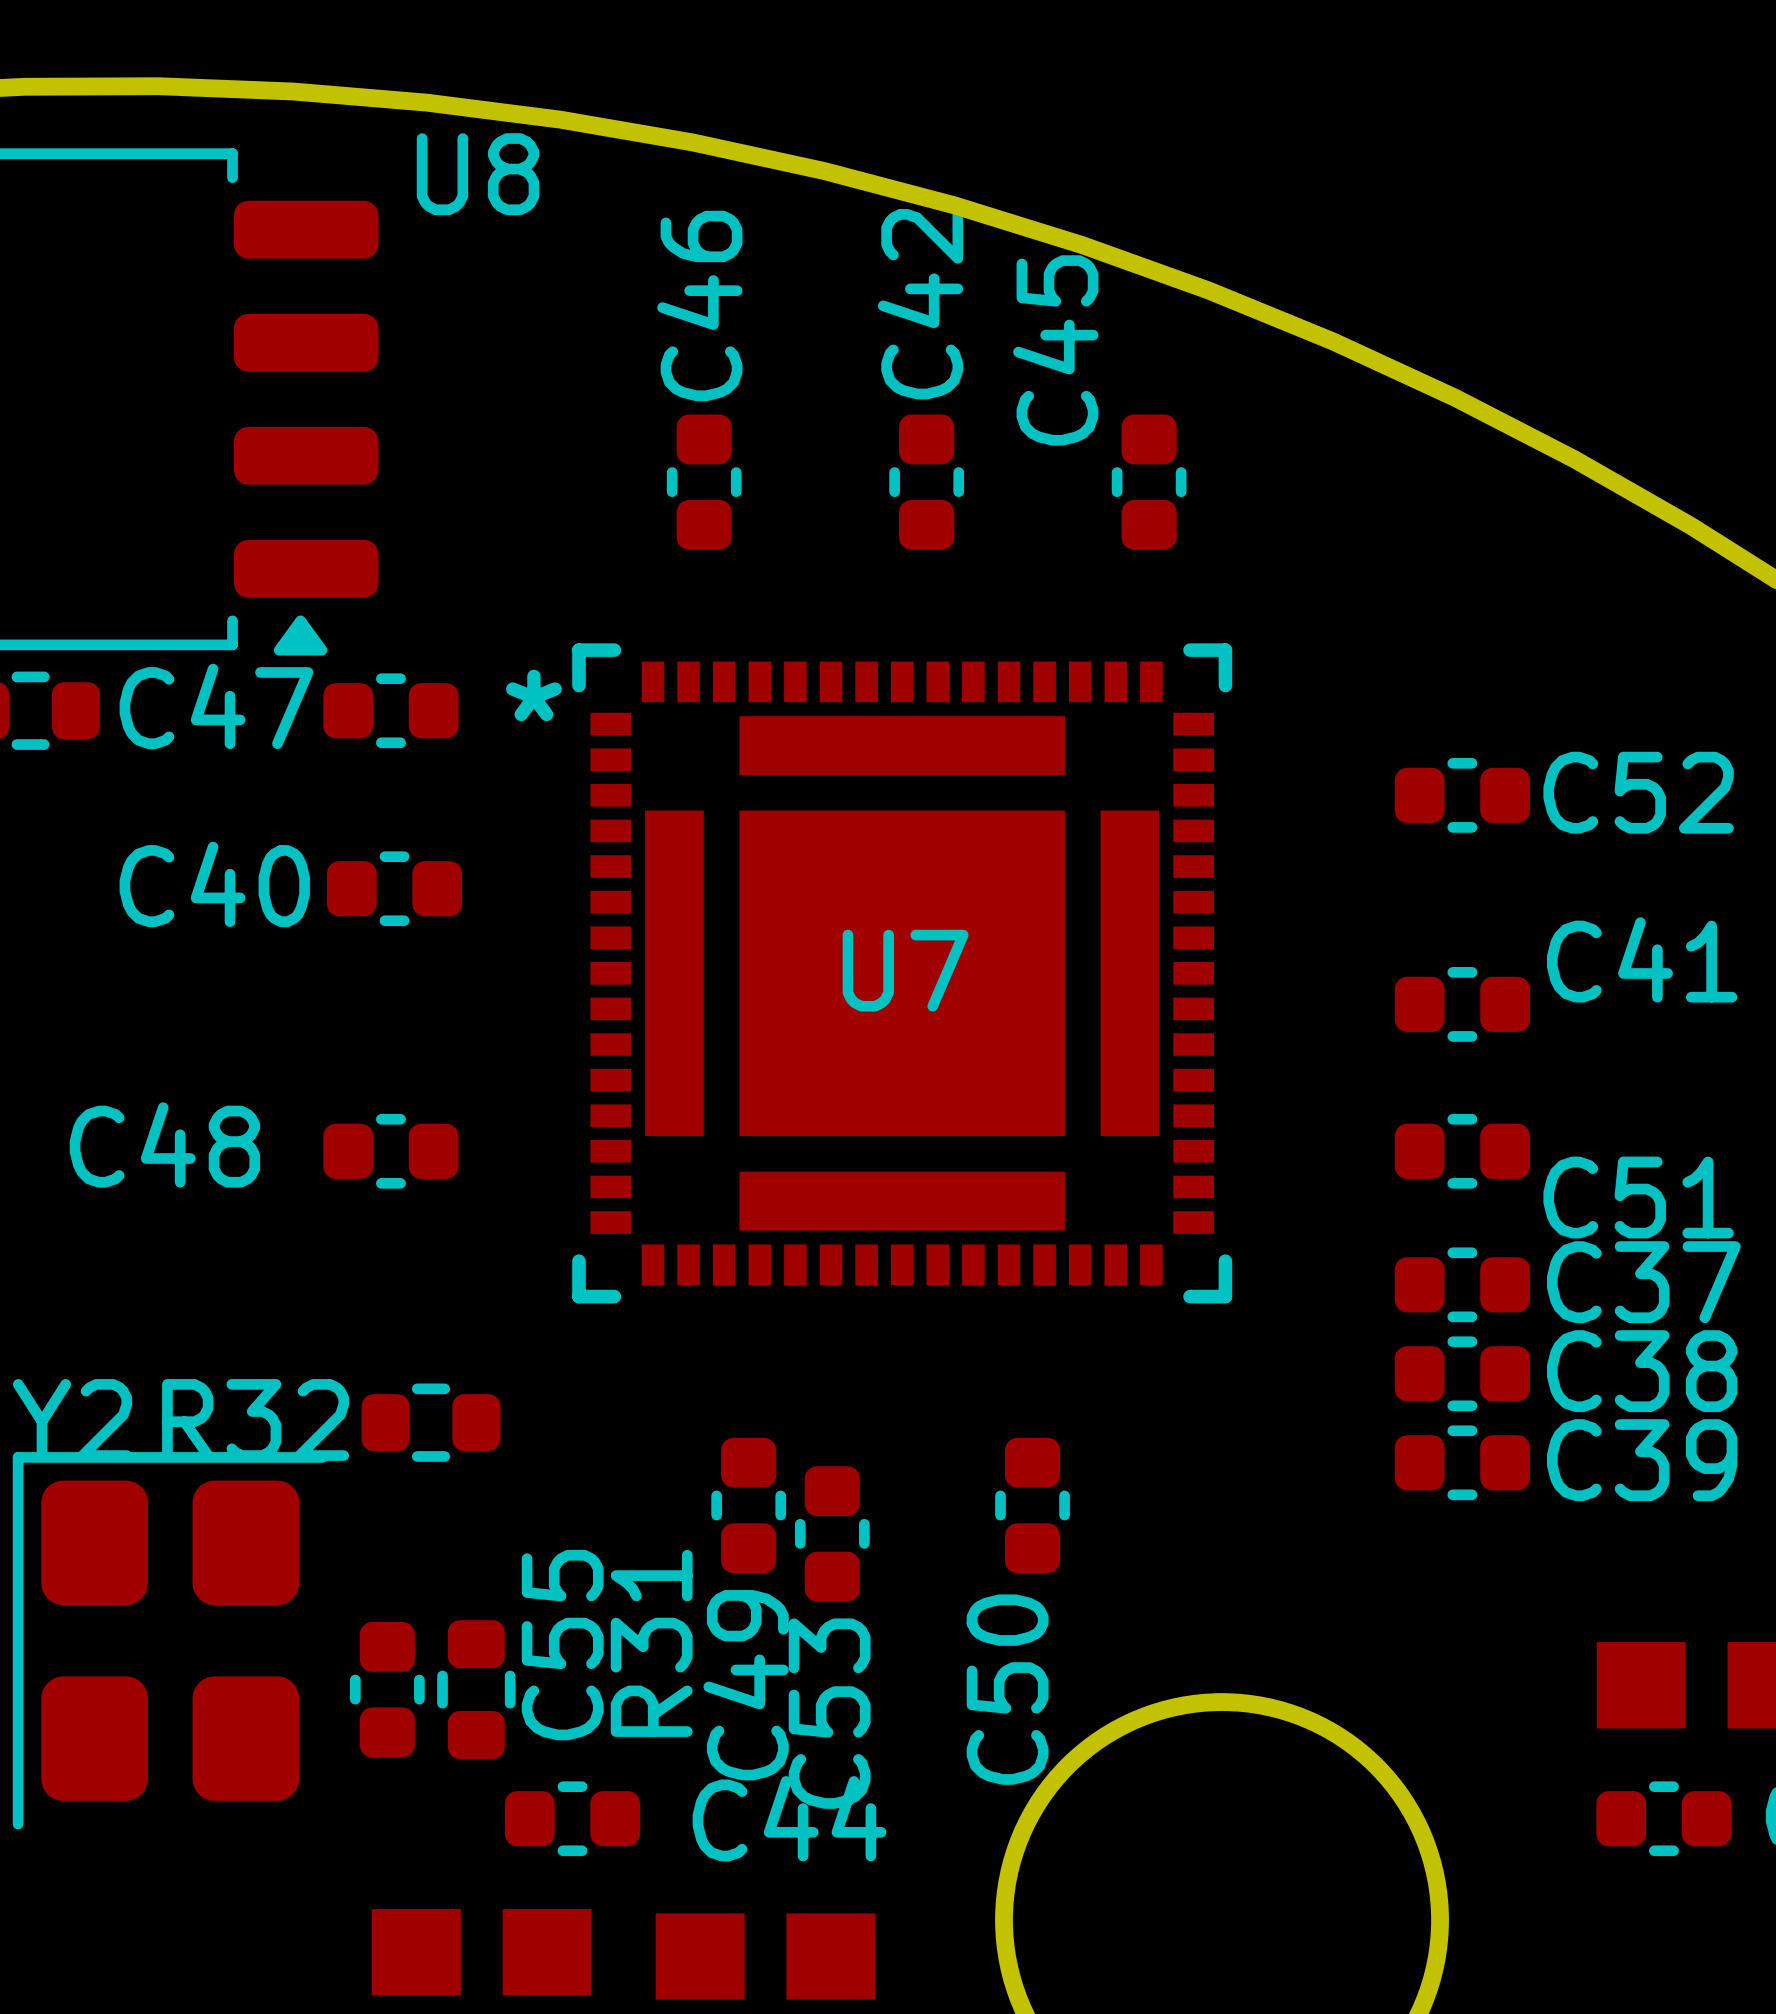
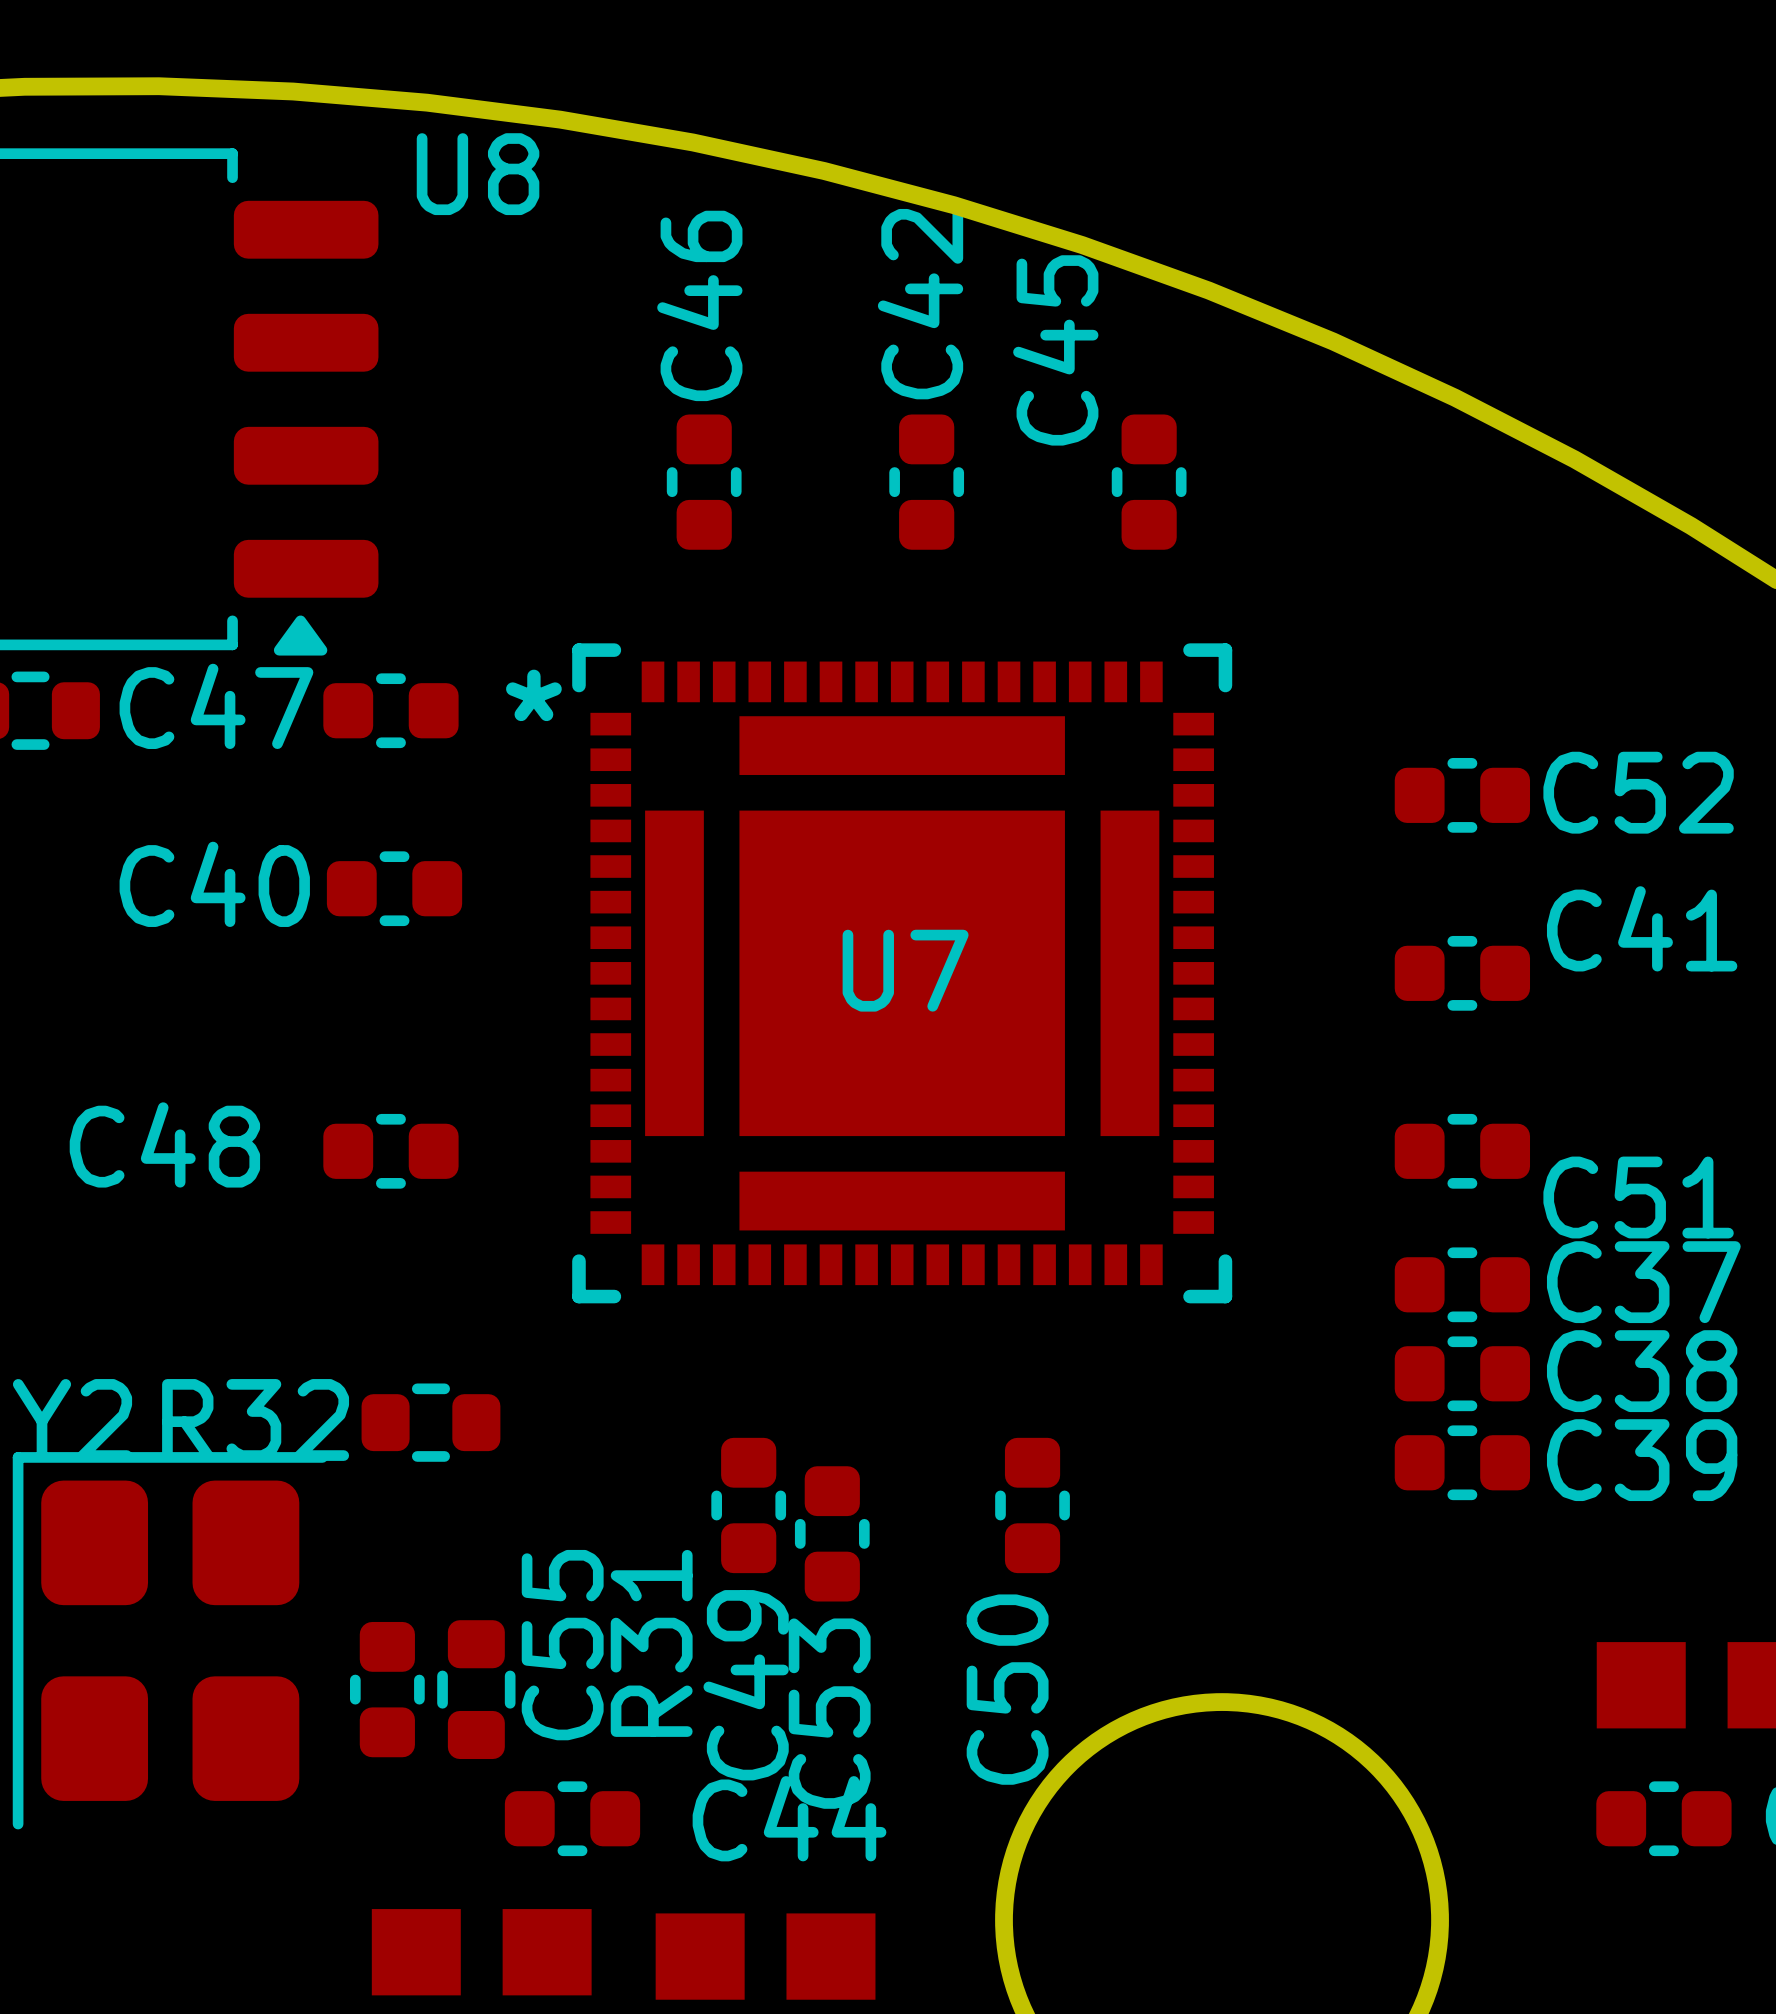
C41 position: (1462, 1004) -> (1462, 973)

